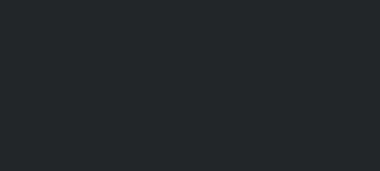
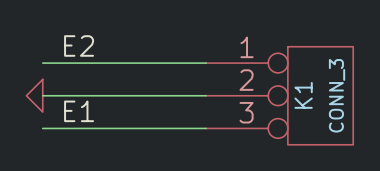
label: none -> E2 (79, 45)
wire: none -> (42, 63) (206, 63)
power symbol: none -> (34, 95)
wire: none -> (42, 95) (206, 95)
K1: none -> CONN_3 (279, 95)
label: none -> E1 (79, 111)
wire: none -> (42, 128) (206, 128)

